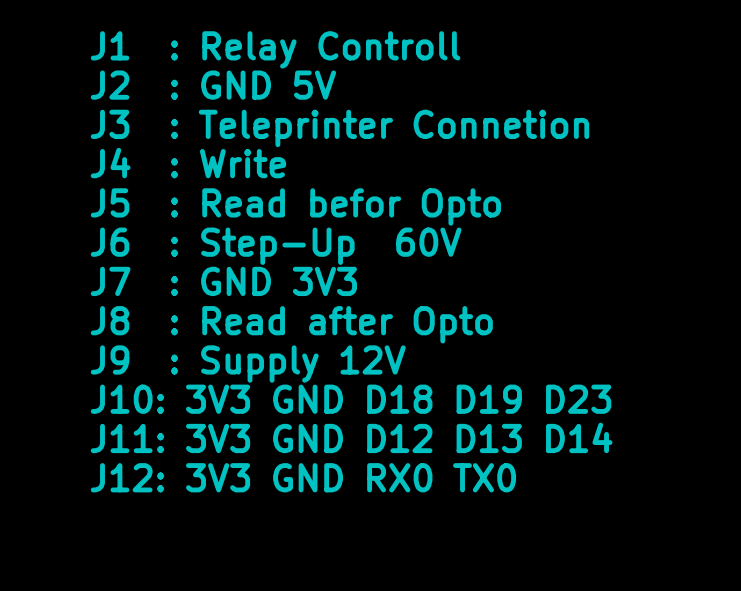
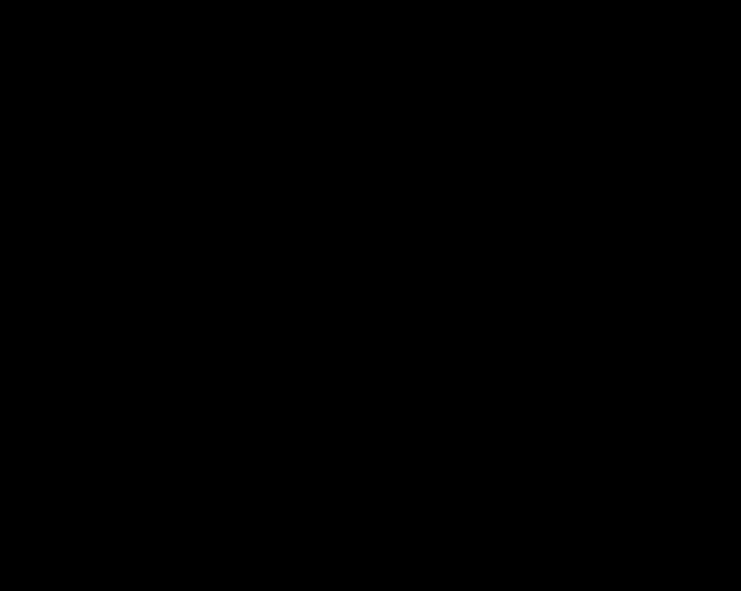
text: J1 : Relay Controll (275, 49) -> none
text: J2 : GND 5V (213, 85) -> none
text: J3 : Teleprinter Connetion (340, 128) -> none
text: J4 : Write (188, 163) -> none
text: J5 : Read befor Opto (295, 206) -> none
text: J6 : Step-Up 60V (276, 246) -> none
text: J7 : GND 3V3 (223, 281) -> none
text: J8 : Read after Opto (291, 324) -> none
text: J9 : Supply 12V (248, 364) -> none
text: J10: 3V3 GND D18 D19 D23 (351, 399) -> none
text: J11: 3V3 GND D12 D13 D14 (351, 437) -> none
text: J12: 3V3 GND RX0 TX0 (303, 477) -> none

